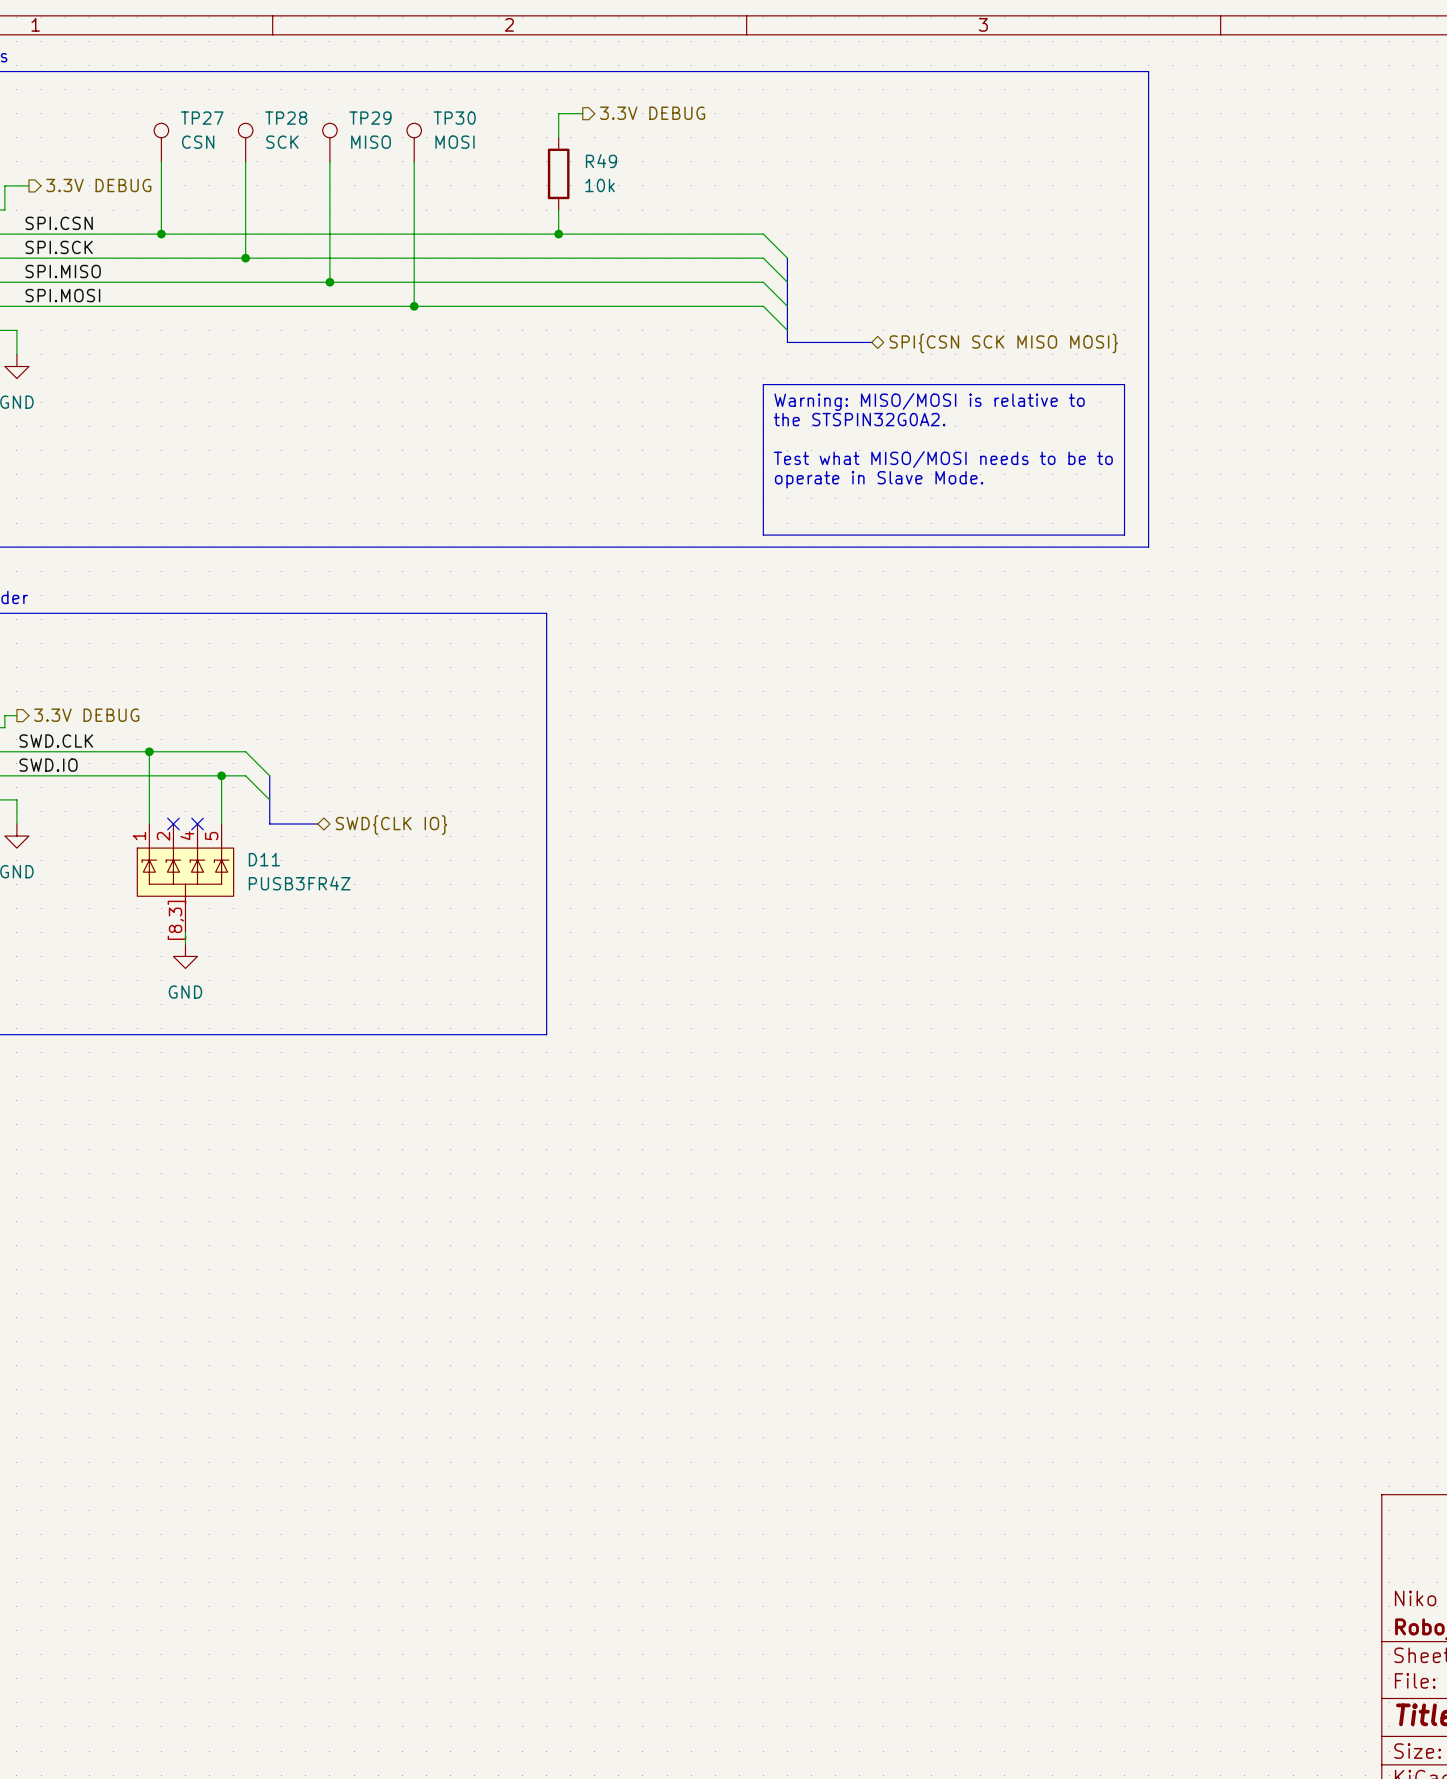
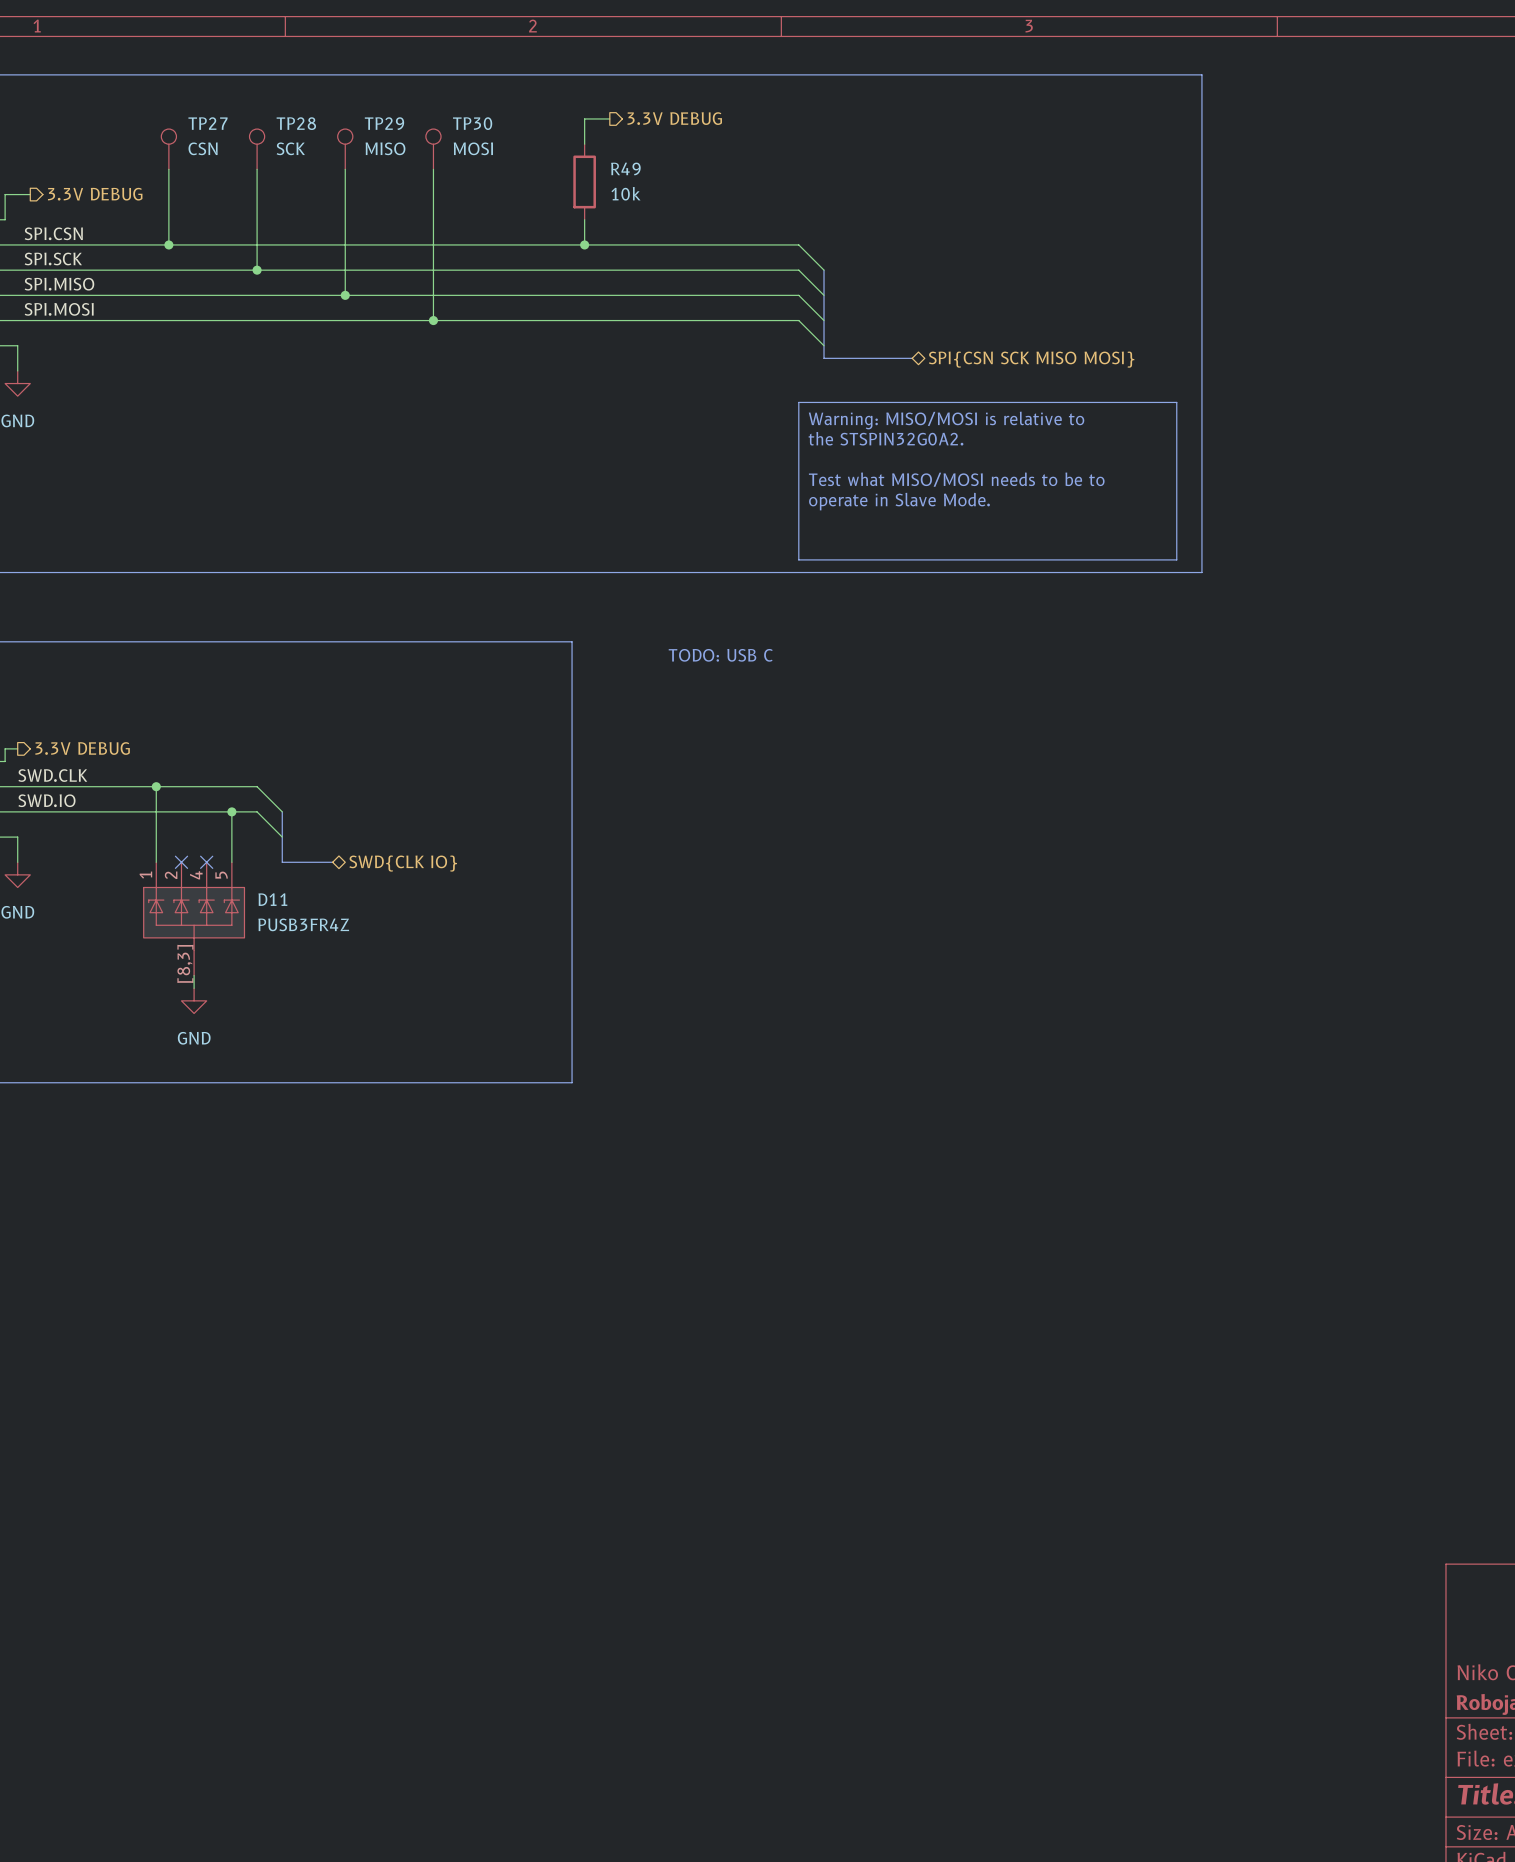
text: none -> TODO: USB C (720, 655)

